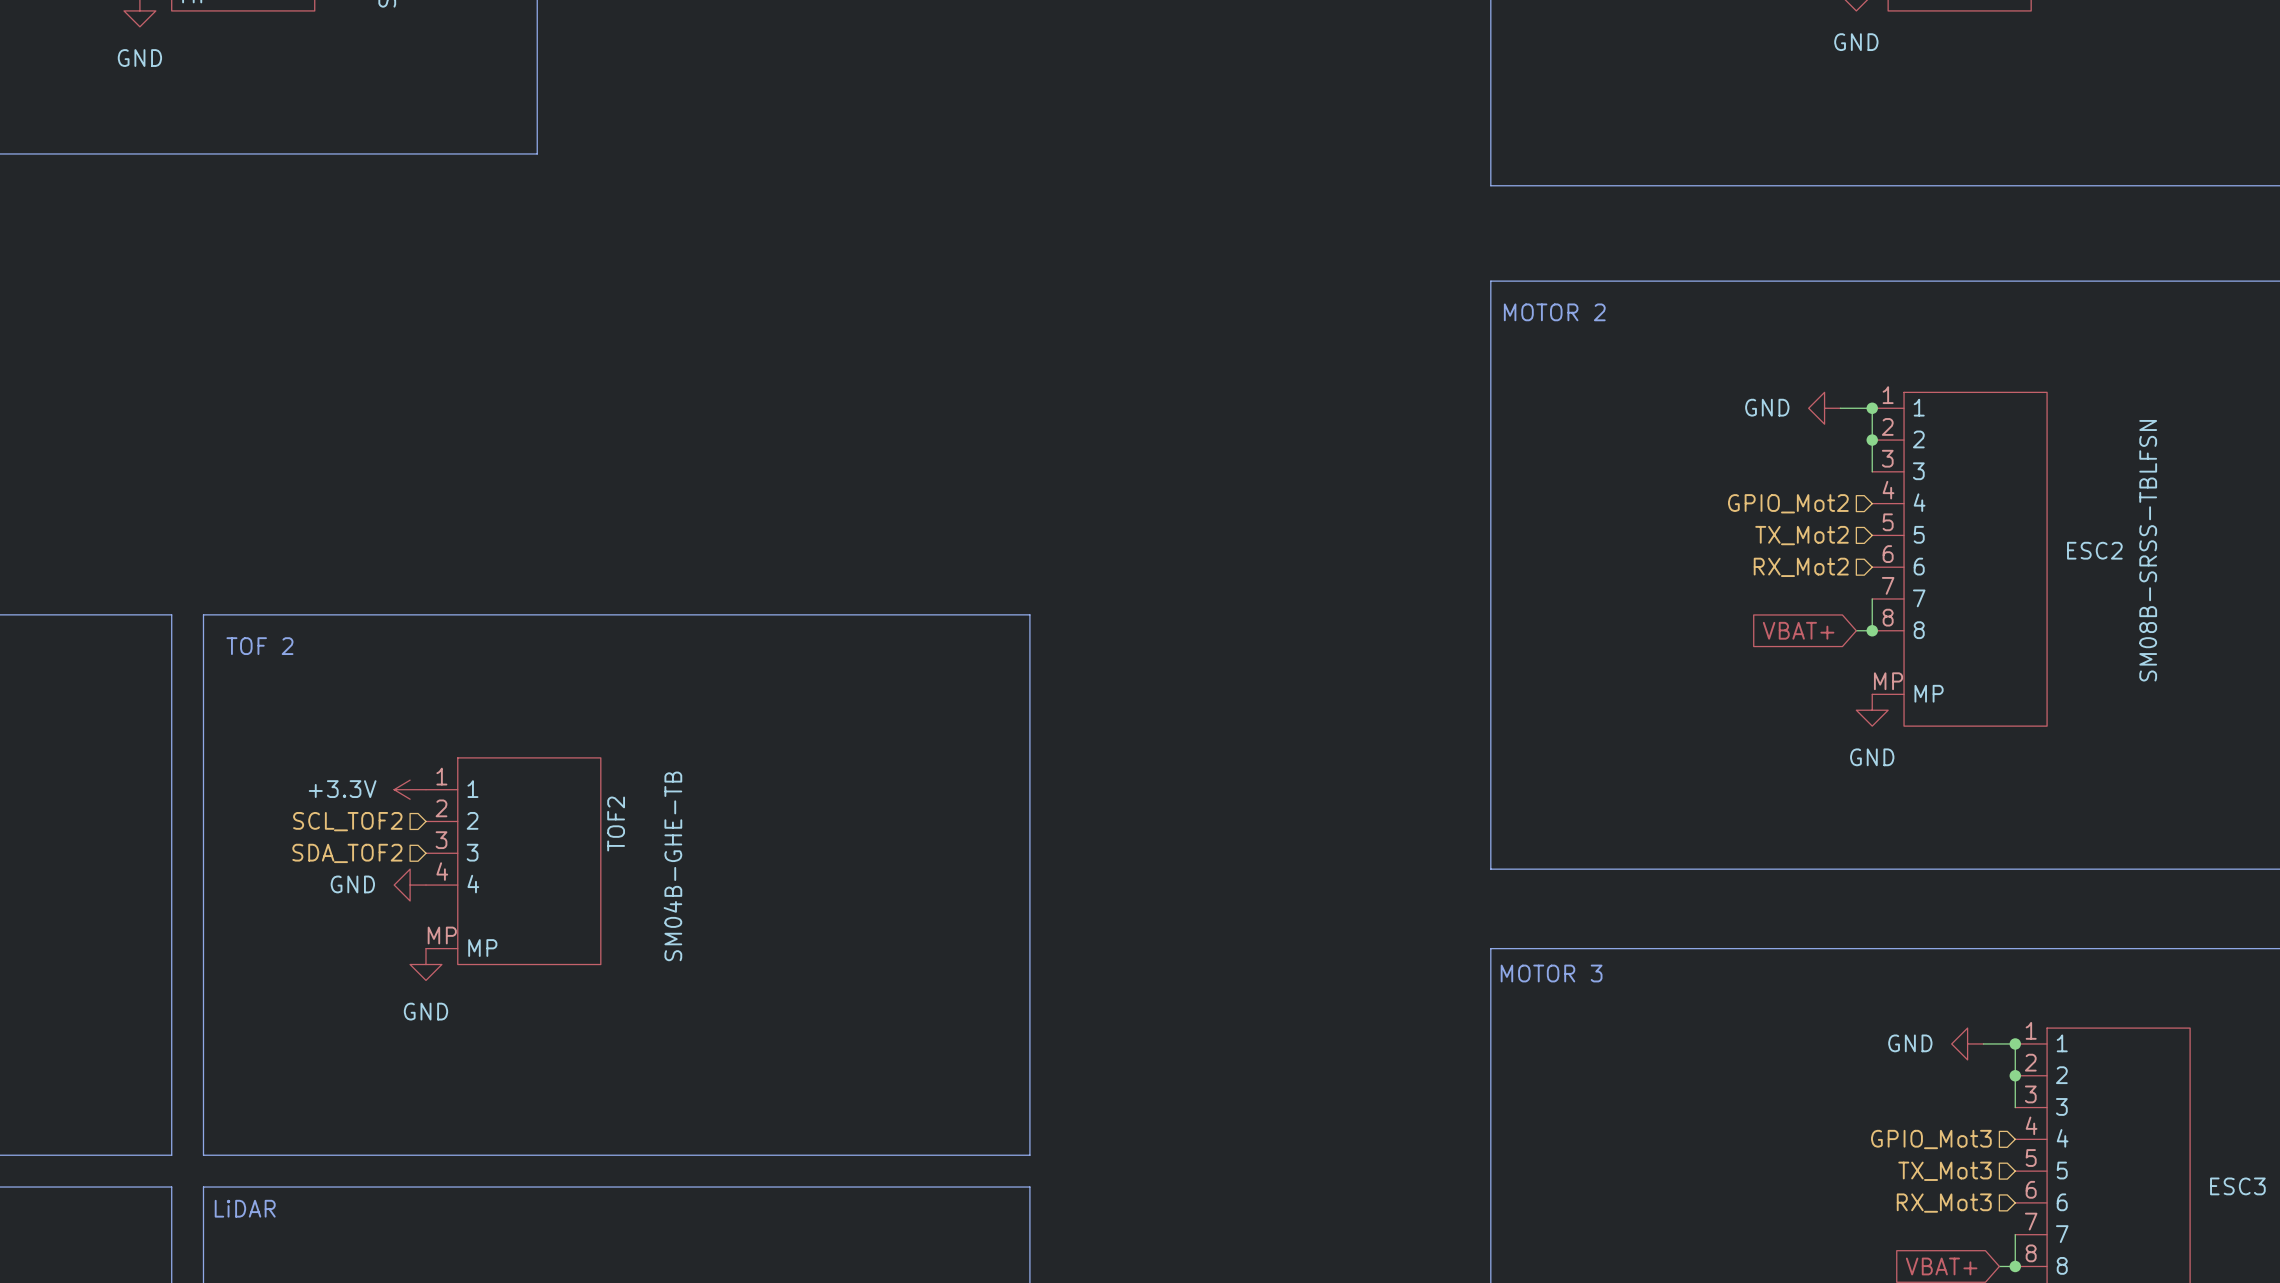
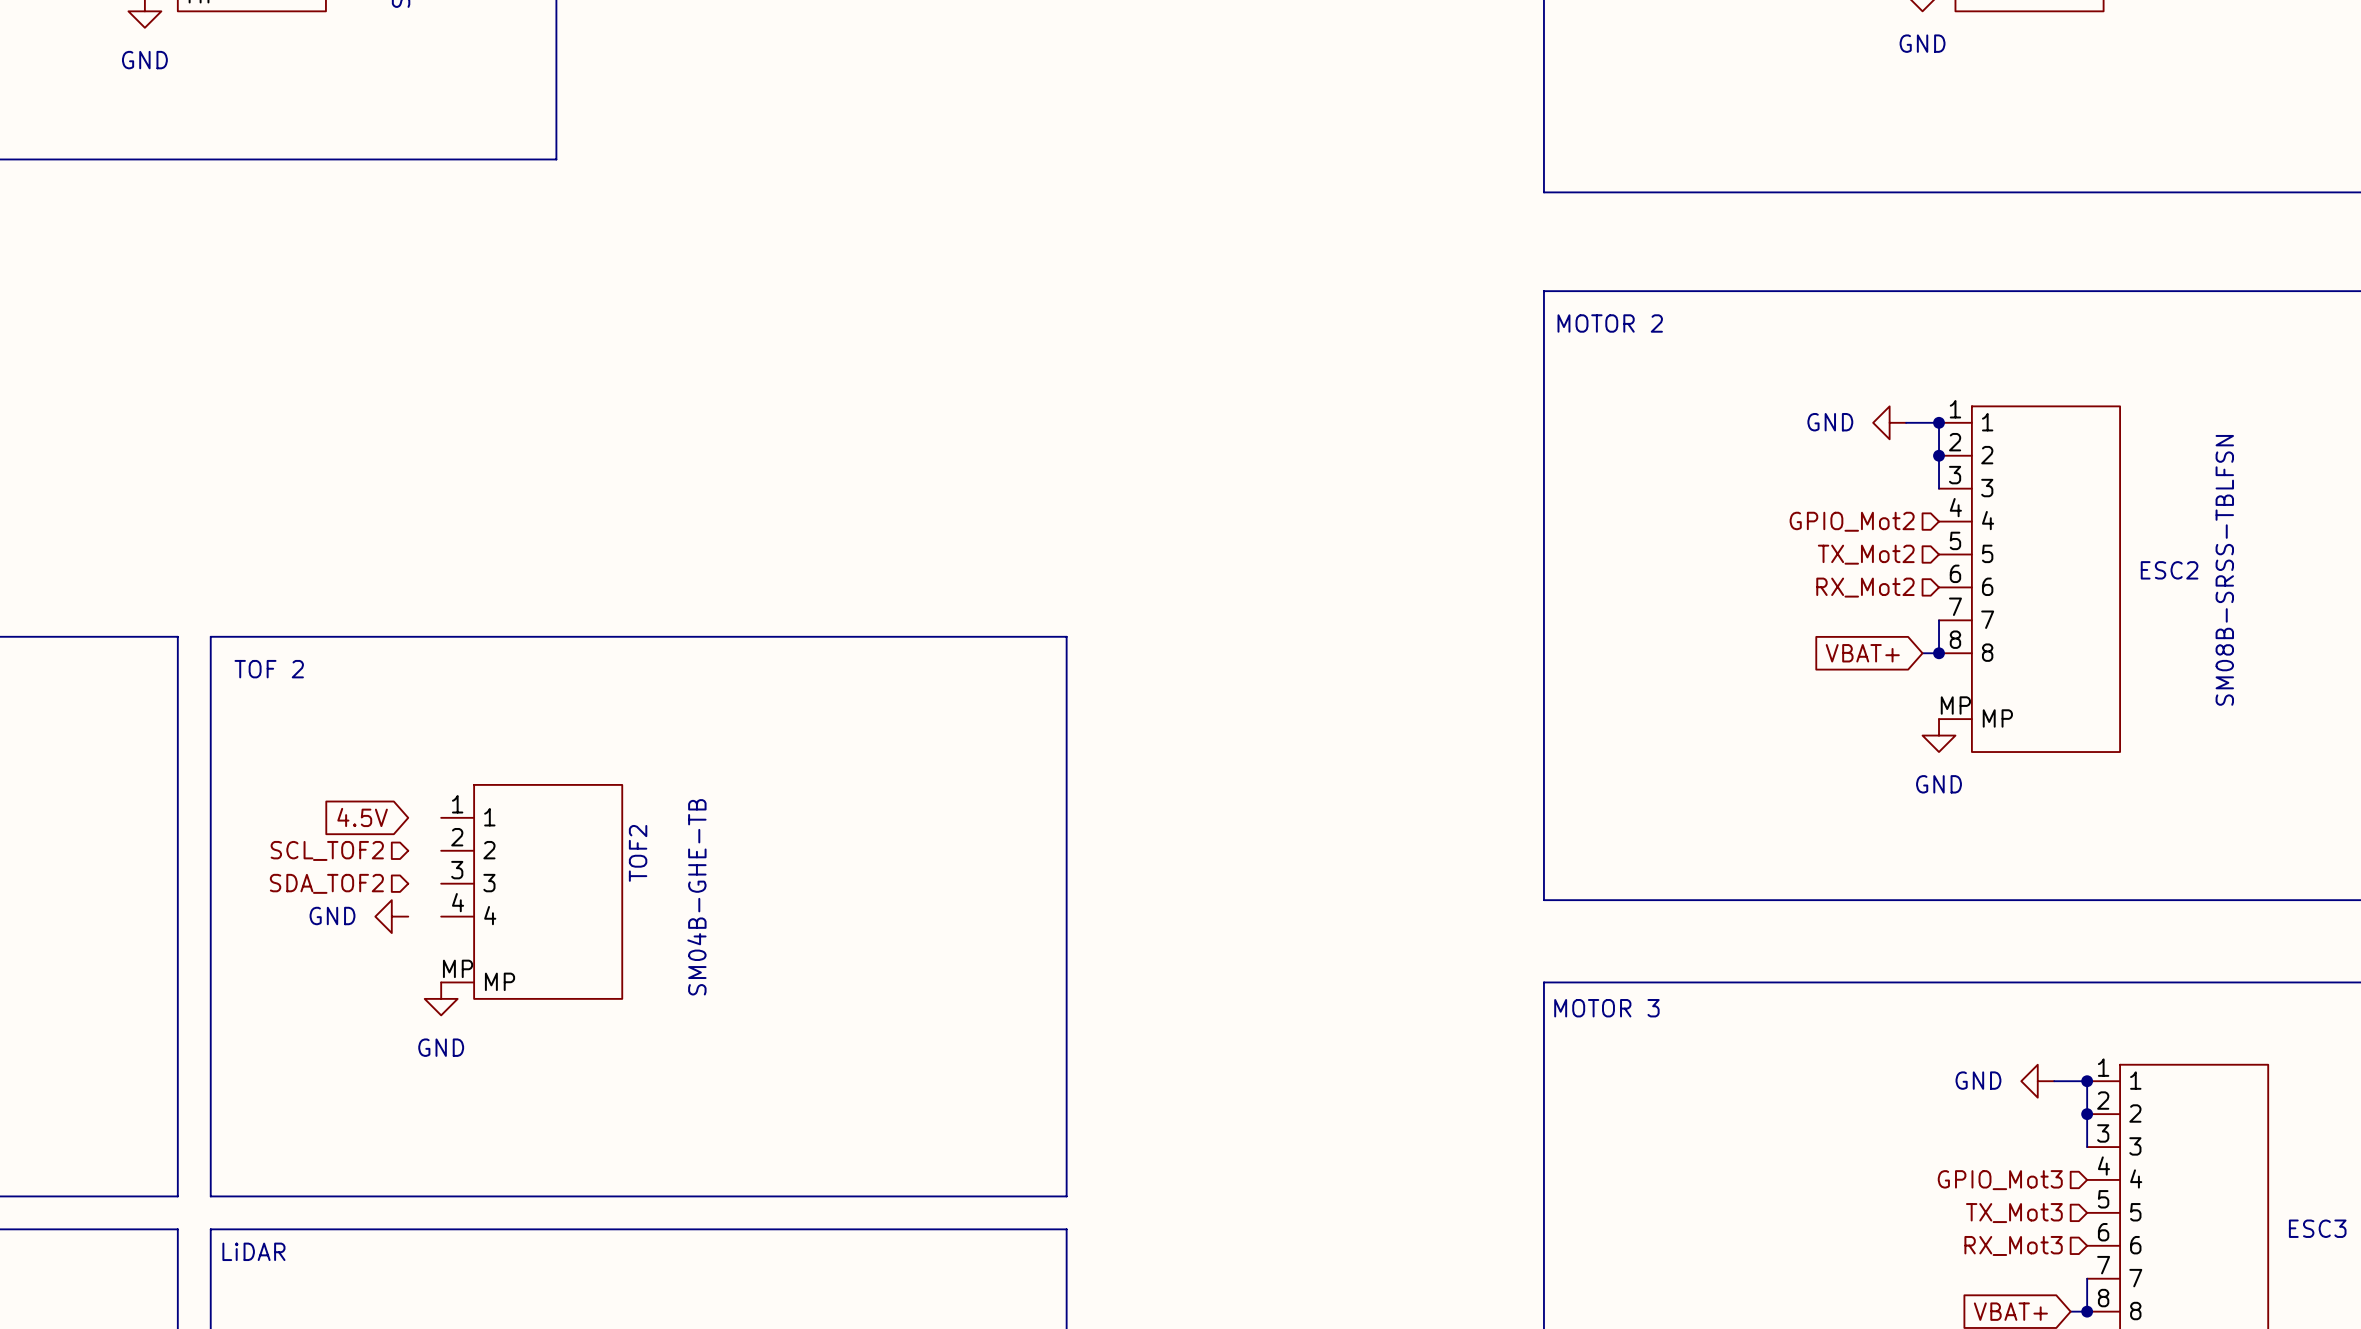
global label: none -> 4.5V (362, 817)
power symbol: +3.3V (410, 789) -> none
hierarchical label position: SCL_TOF2 (347, 821) -> SCL_TOF2 (327, 850)
hierarchical label position: SDA_TOF2 (347, 853) -> SDA_TOF2 (326, 883)
power symbol position: GND (410, 885) -> GND (391, 916)

